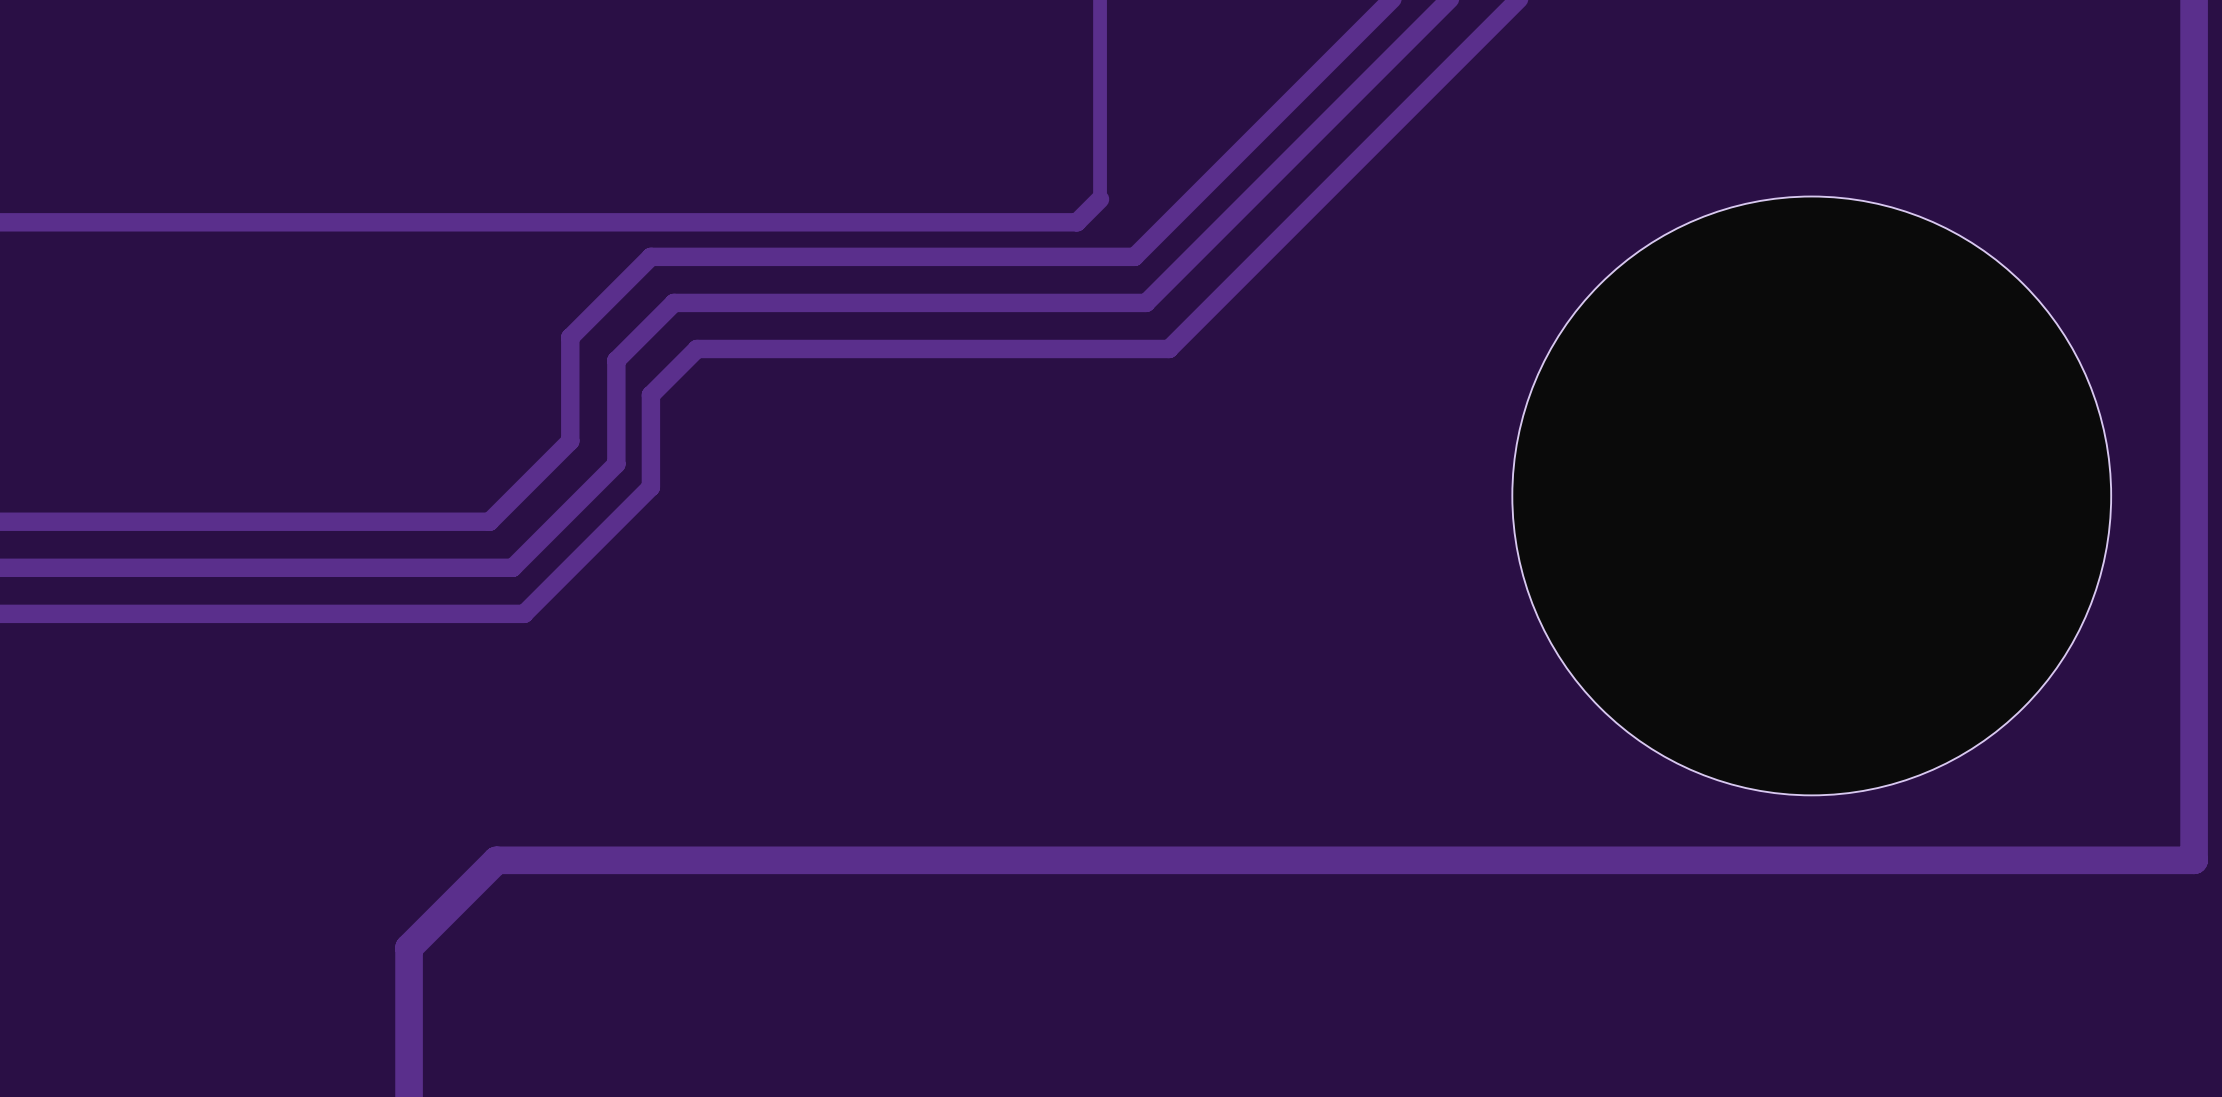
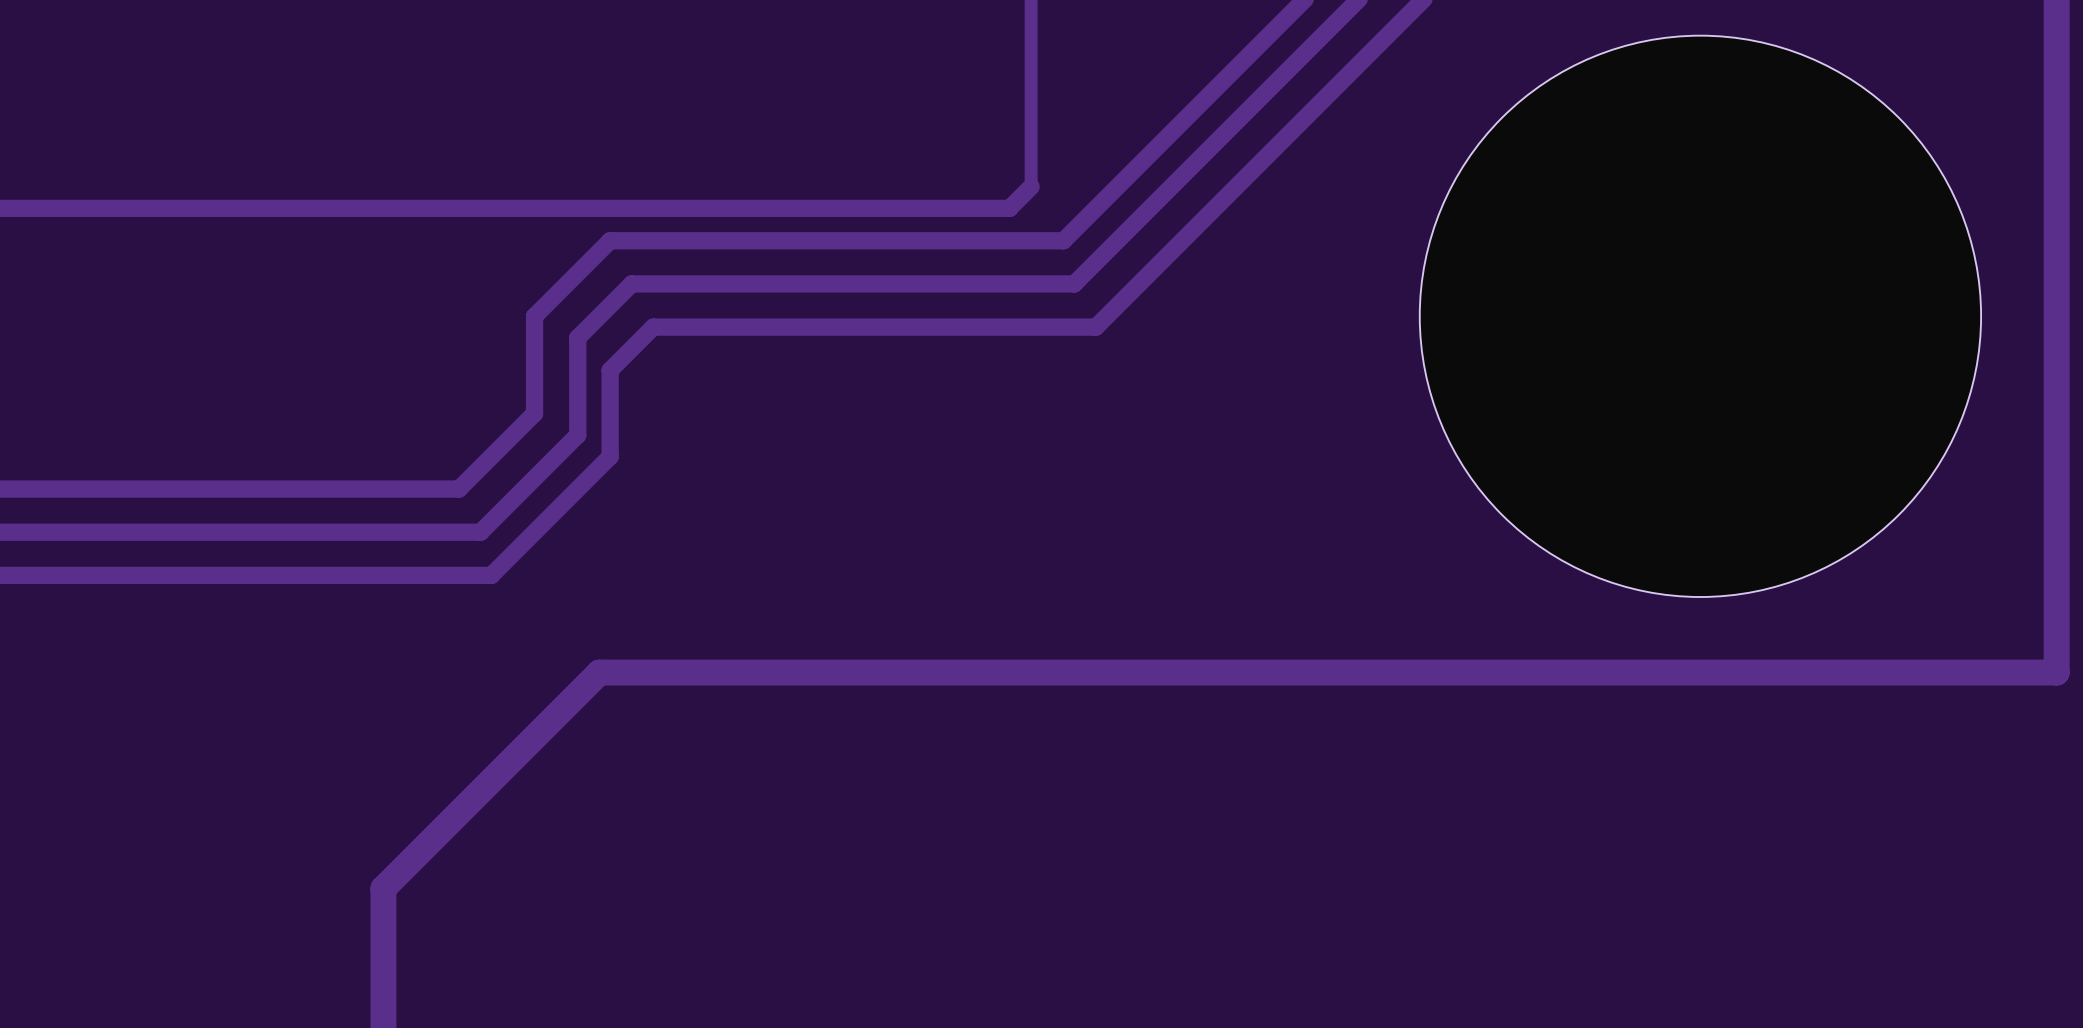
part position: (1811, 495) -> (1700, 316)
track: (2194, 717) (2194, 860) (496, 860) -> (2056, 672) (599, 672) (465, 806)

